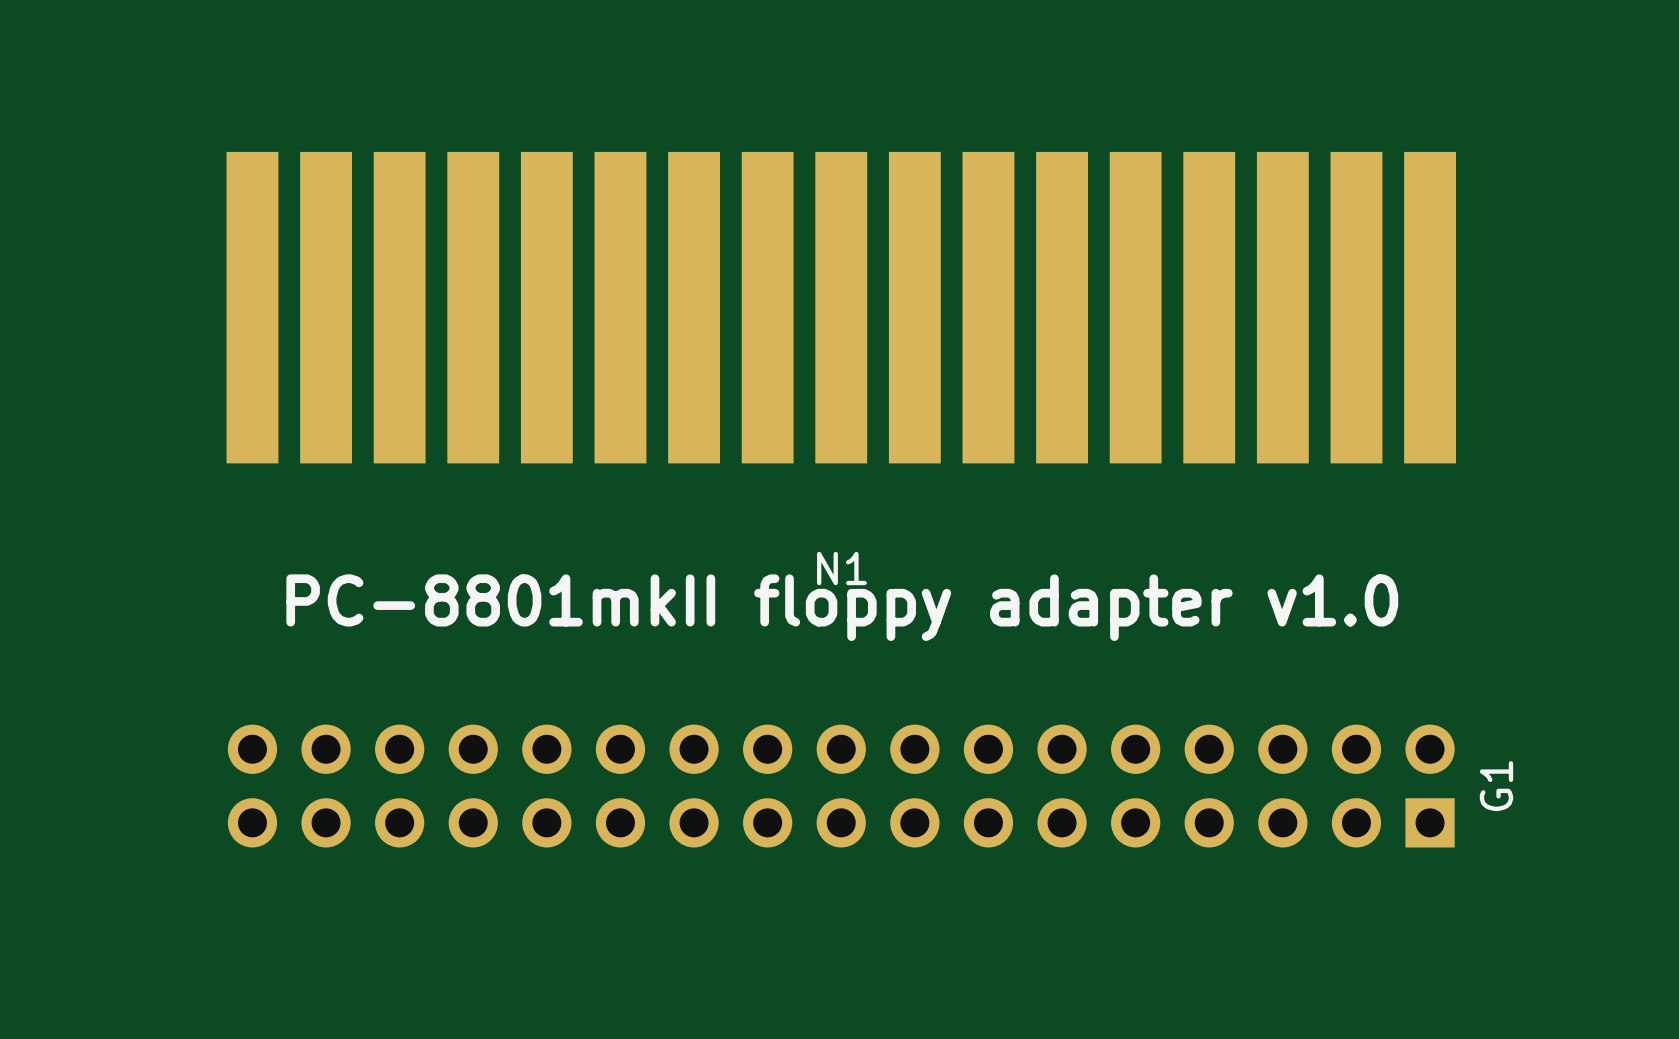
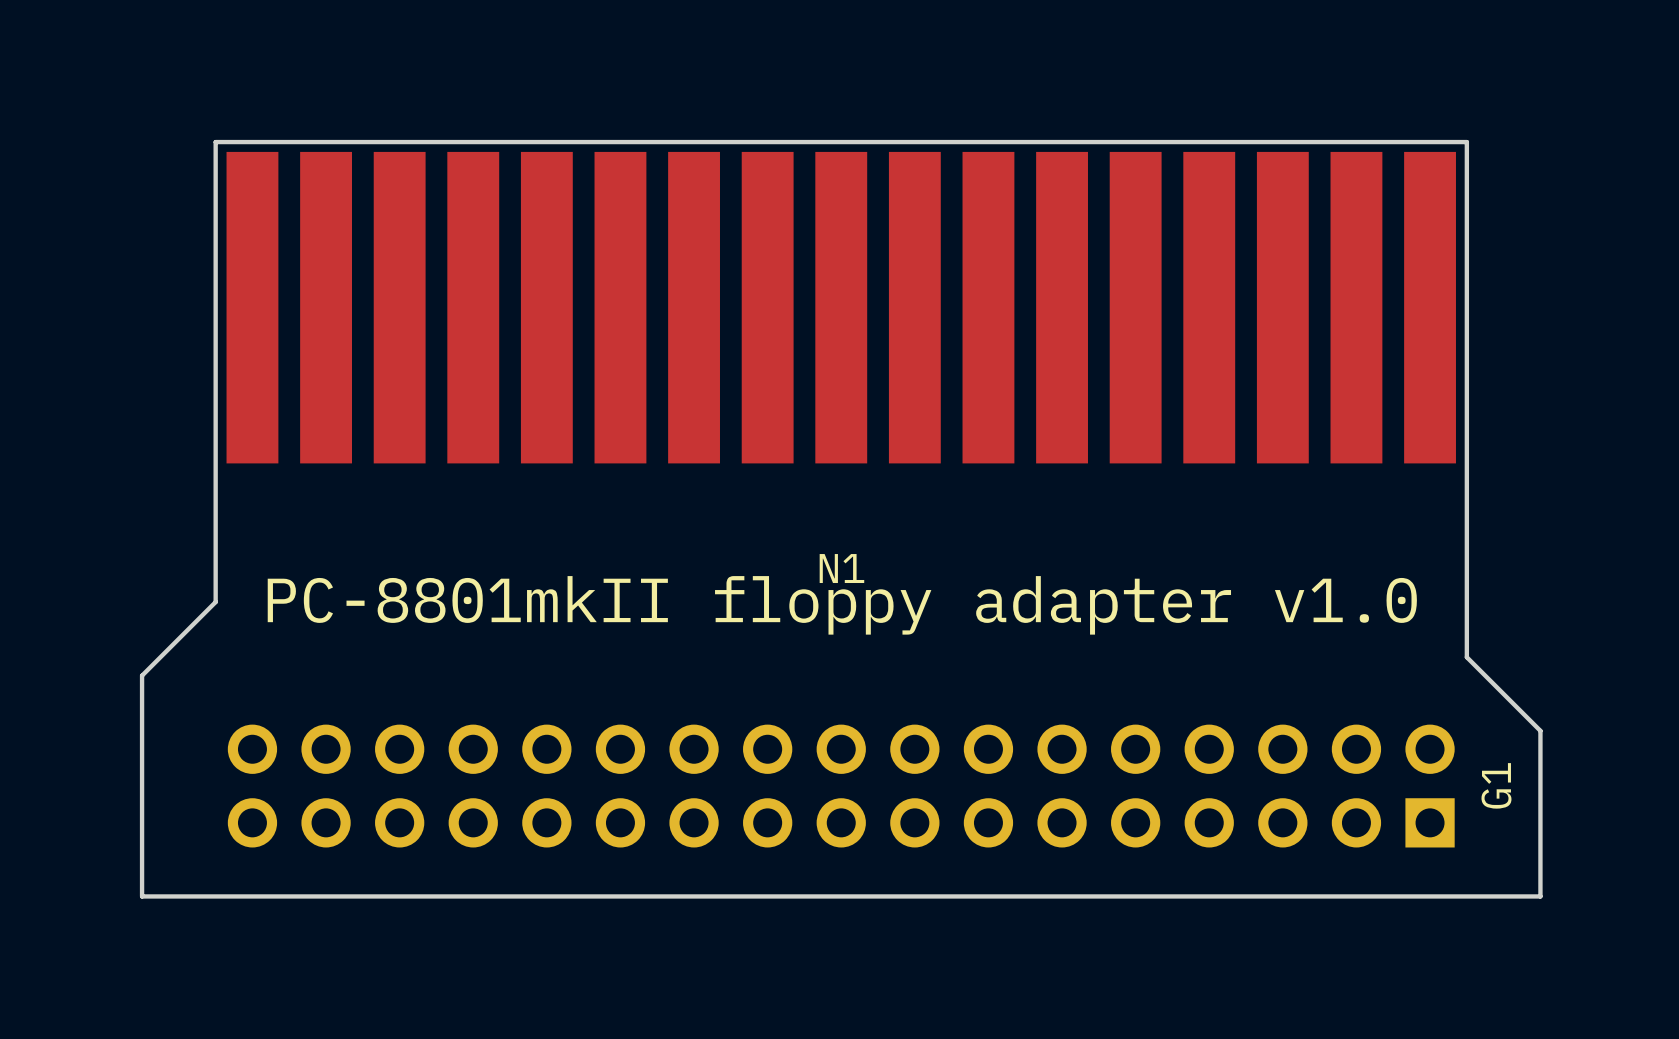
board edge: none -> (215, 142) (215, 602) (142, 675) (142, 896) (1540, 896) (1540, 730) (1466, 657) (1466, 142) (215, 142)

